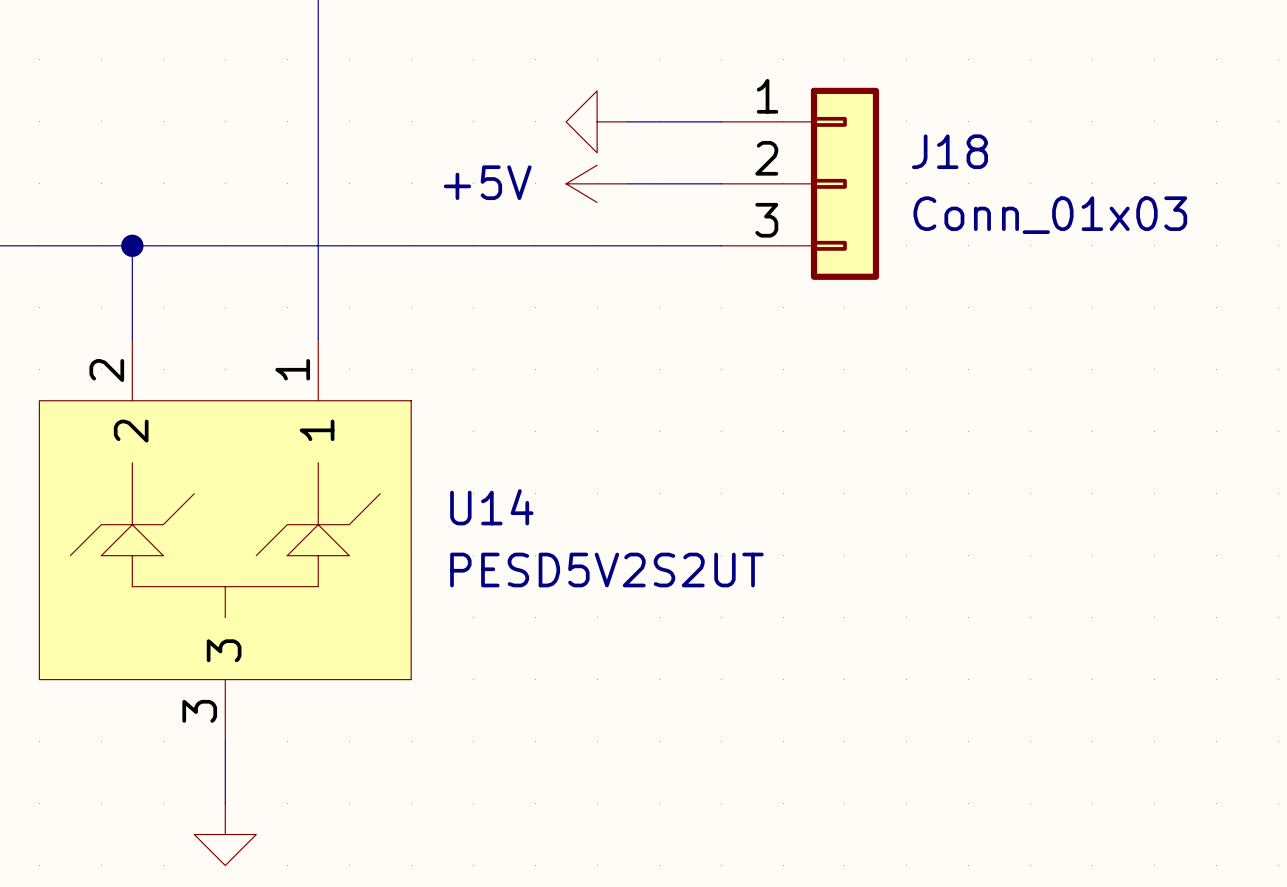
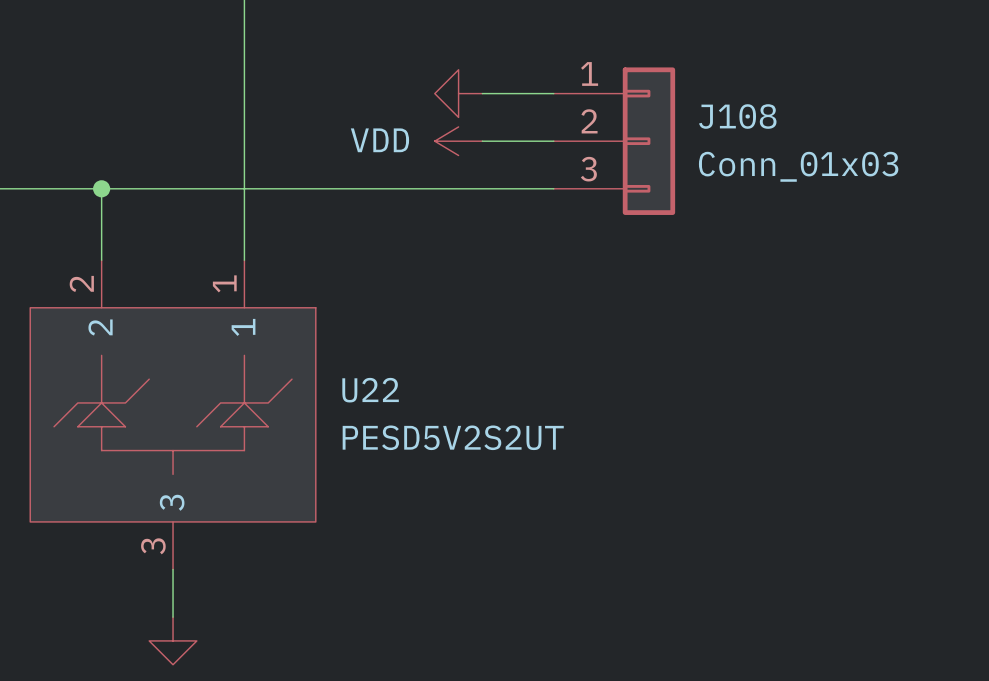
J18 name: J18 (949, 151) -> J108 (737, 116)
power symbol: +5V (597, 183) -> VDD (458, 141)
U14 name: U14 (491, 507) -> U22 (370, 390)

